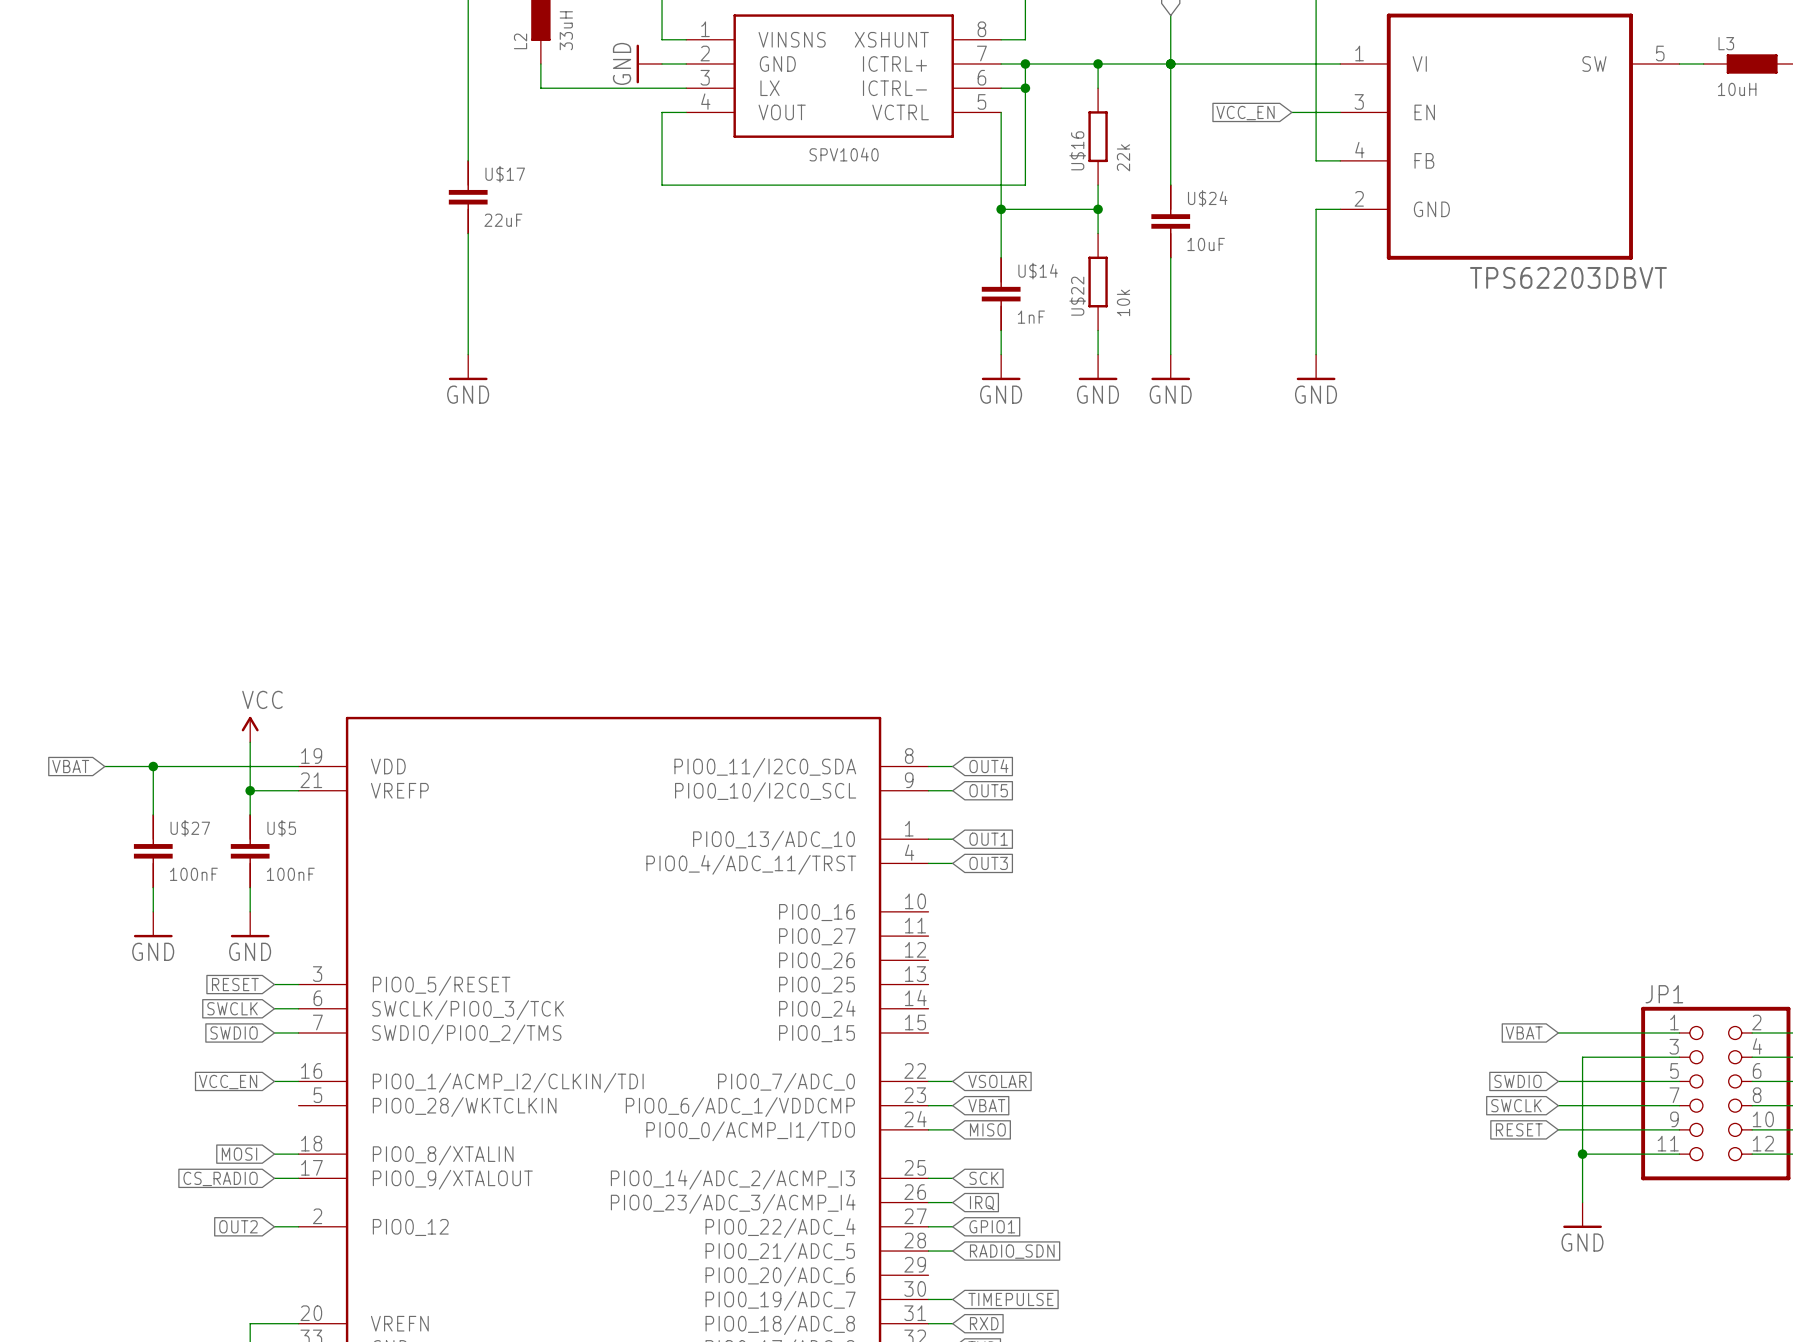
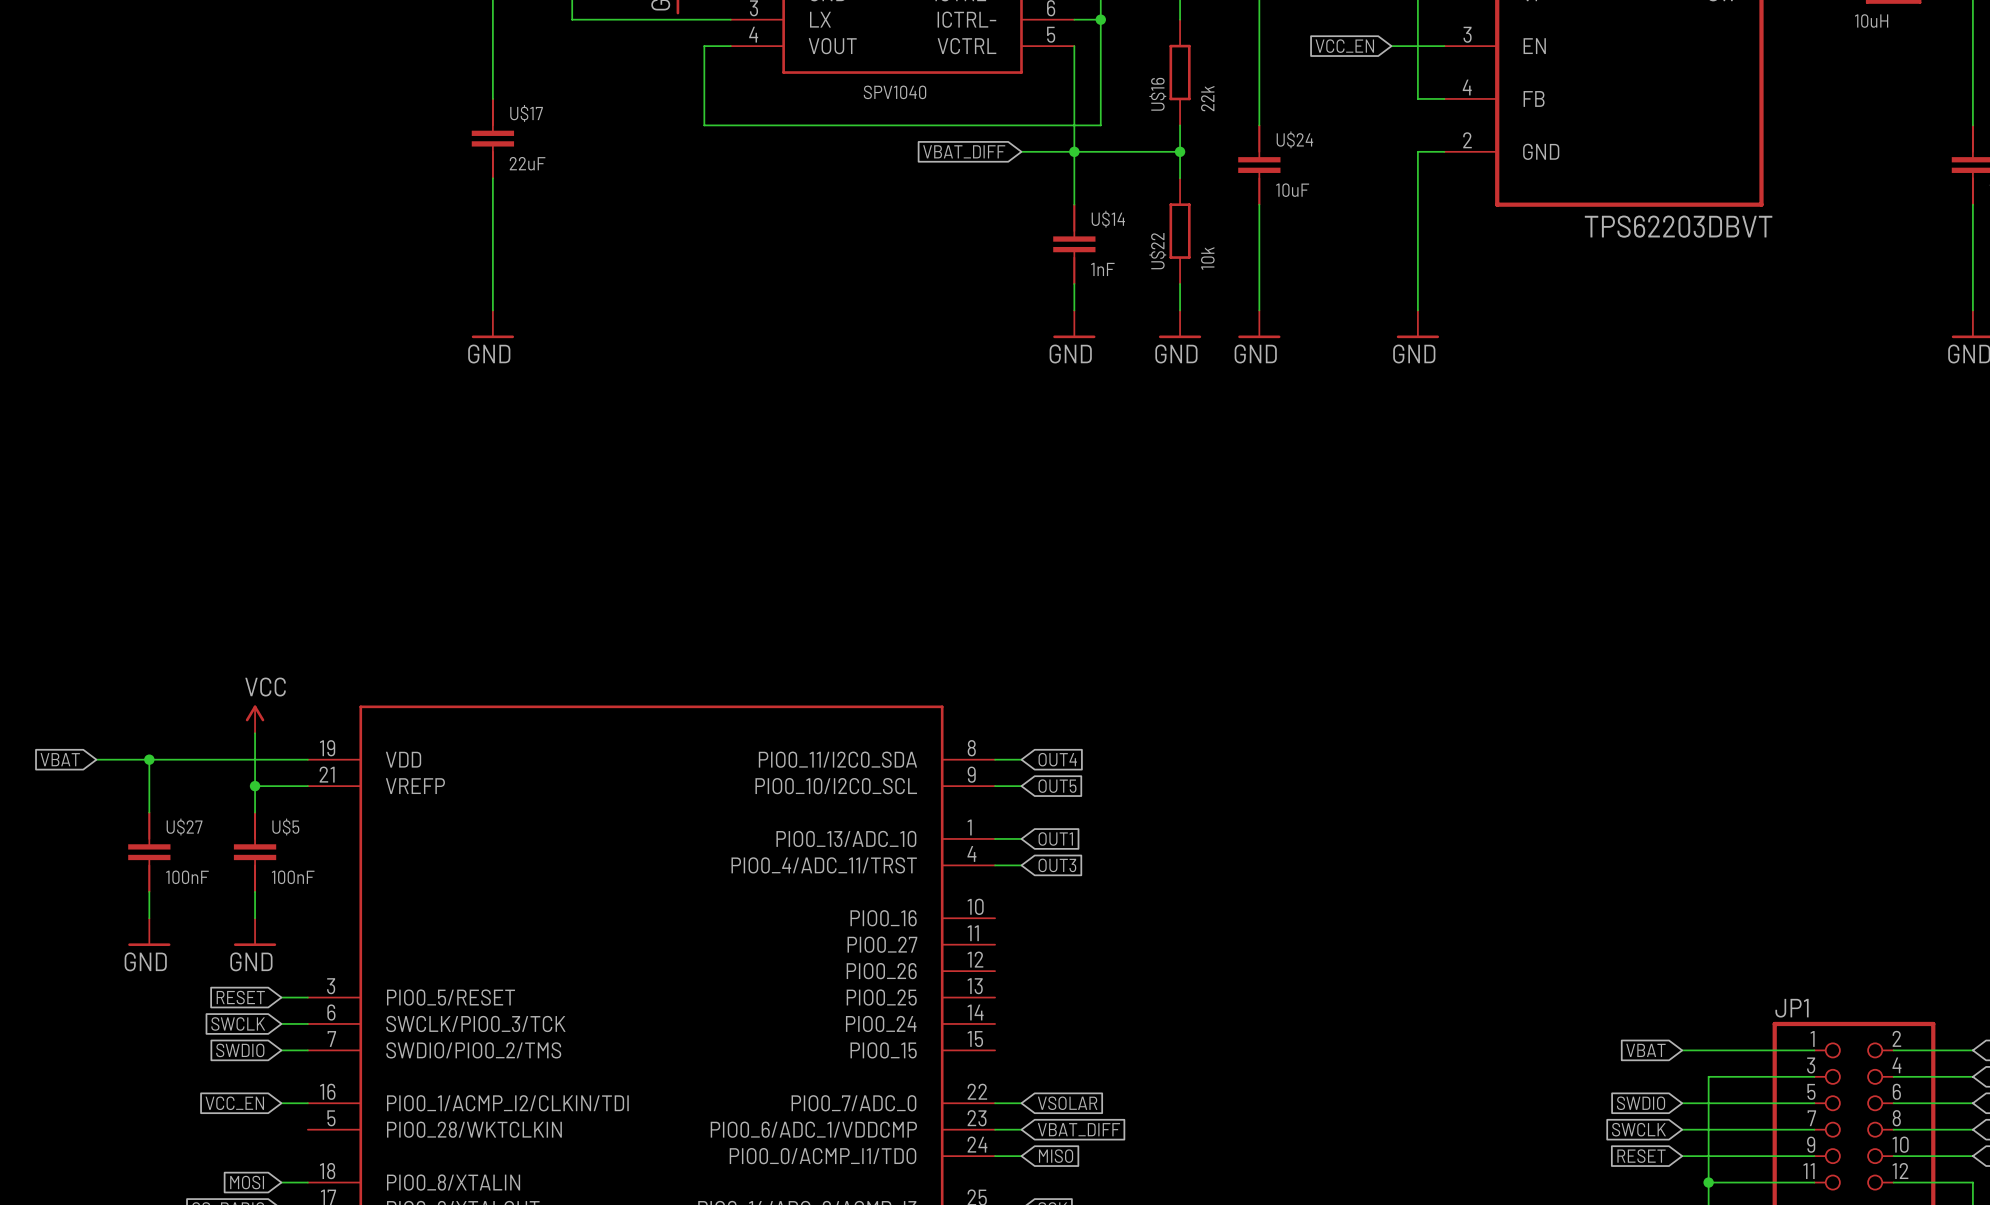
global label: none -> VBAT_DIFF (964, 151)
wire: none -> (1021, 151) (1074, 151)
global label: VBAT (986, 1105) -> VBAT_DIFF (1078, 1129)

